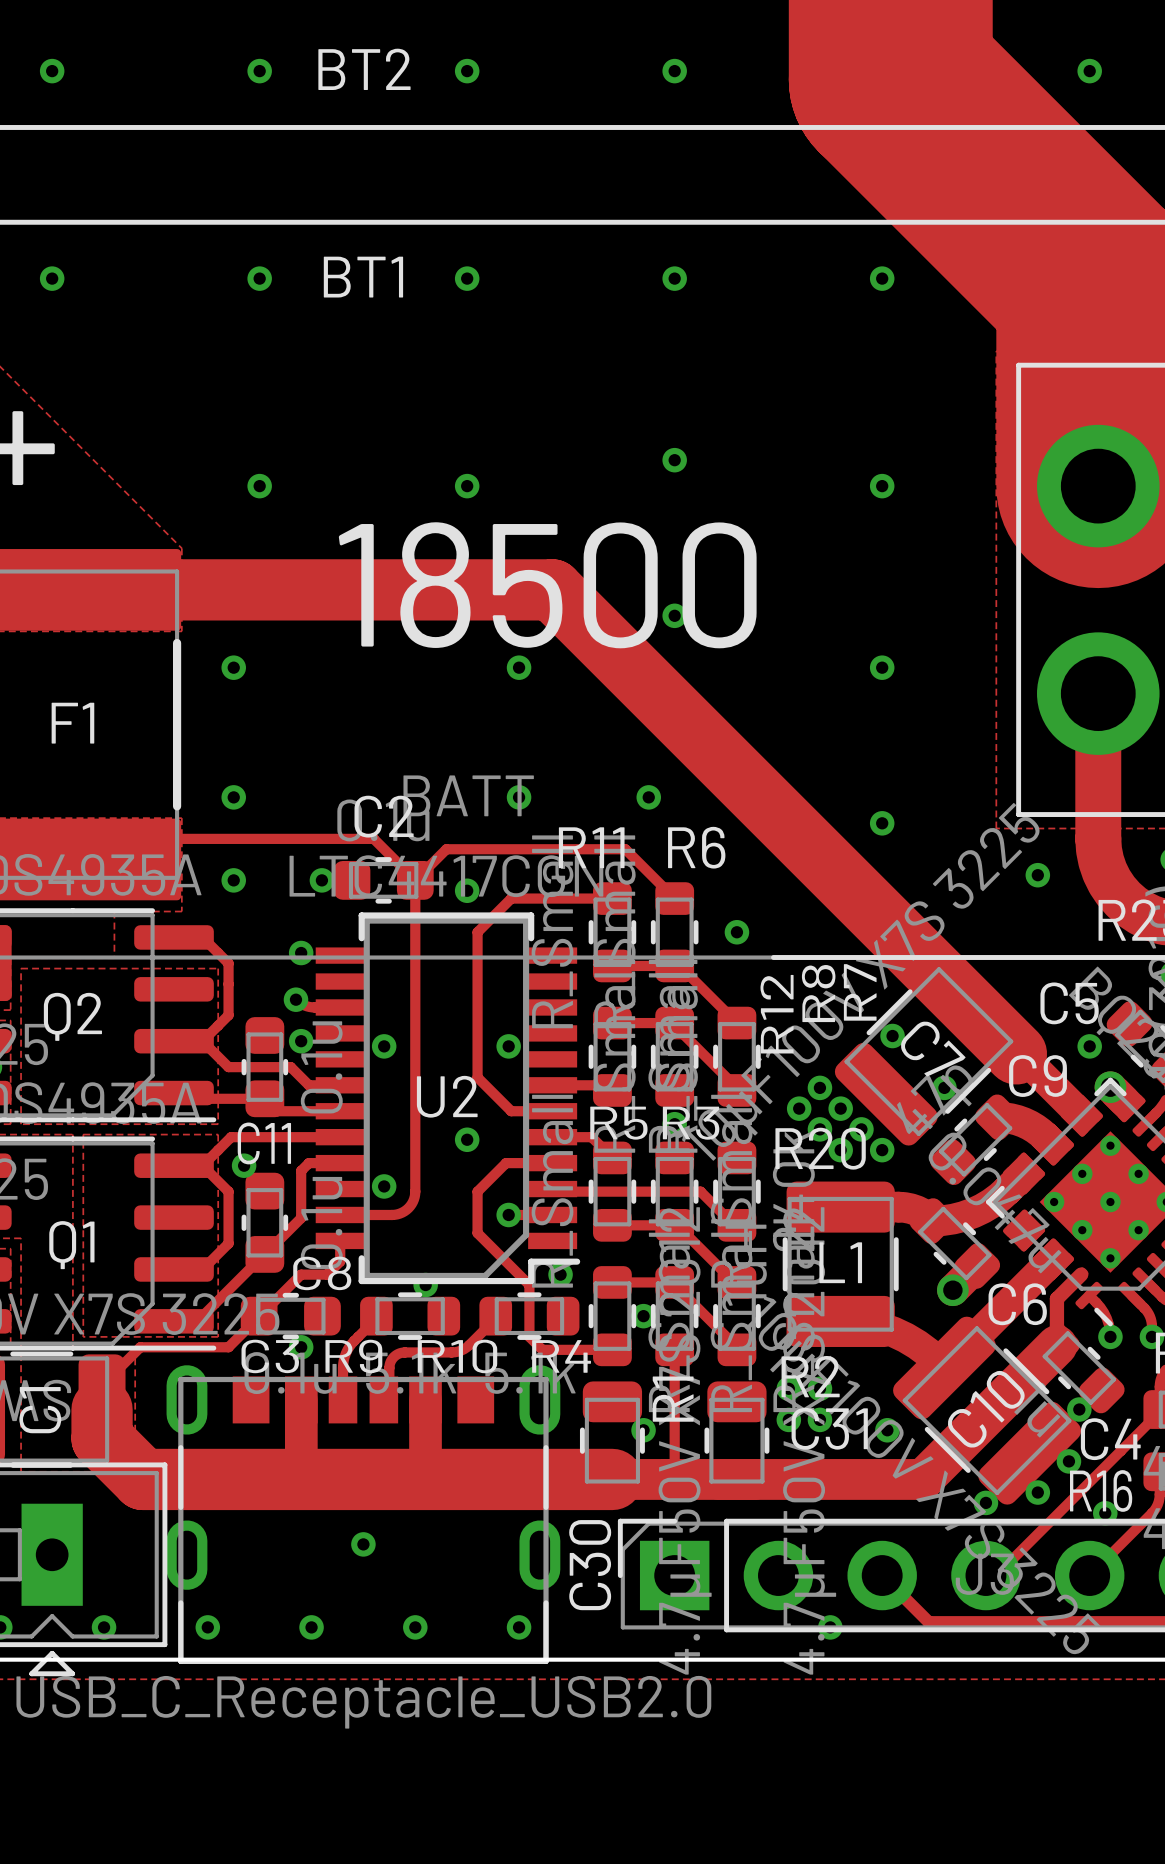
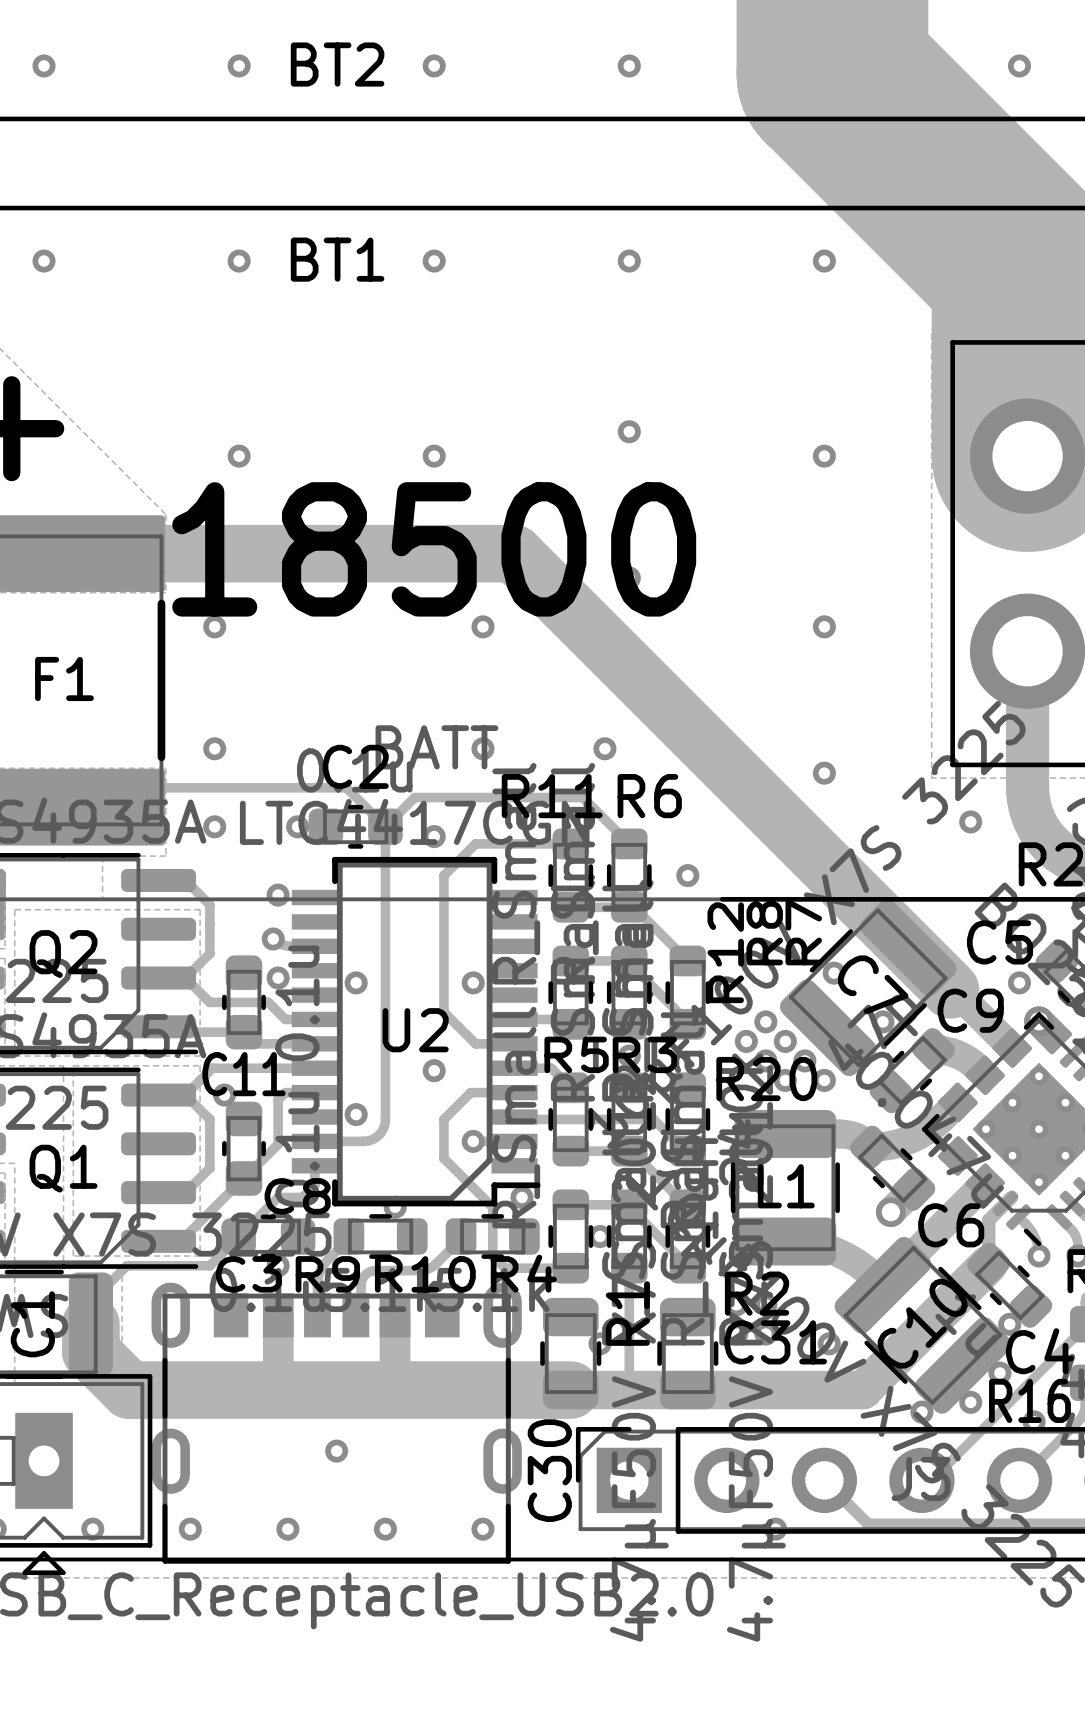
BT1 text position: 18500 (547, 585) -> 18500 (434, 549)

